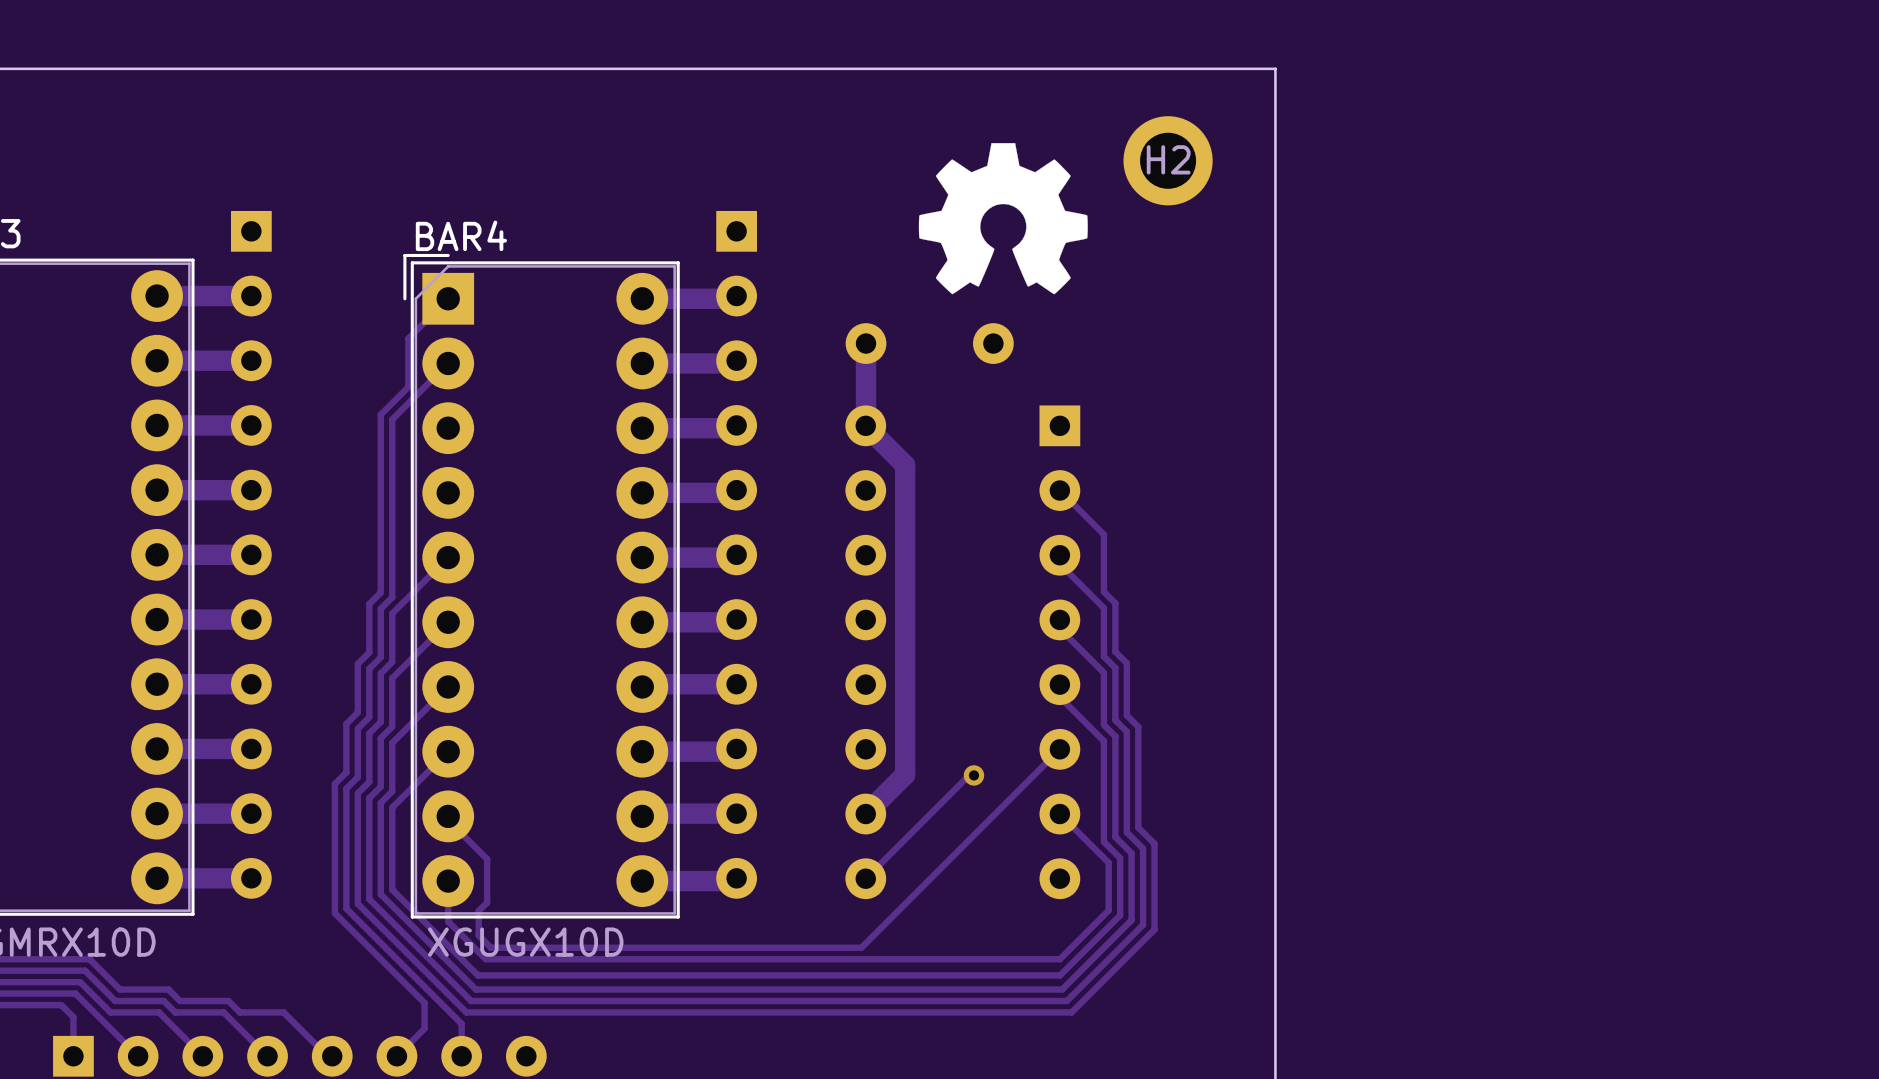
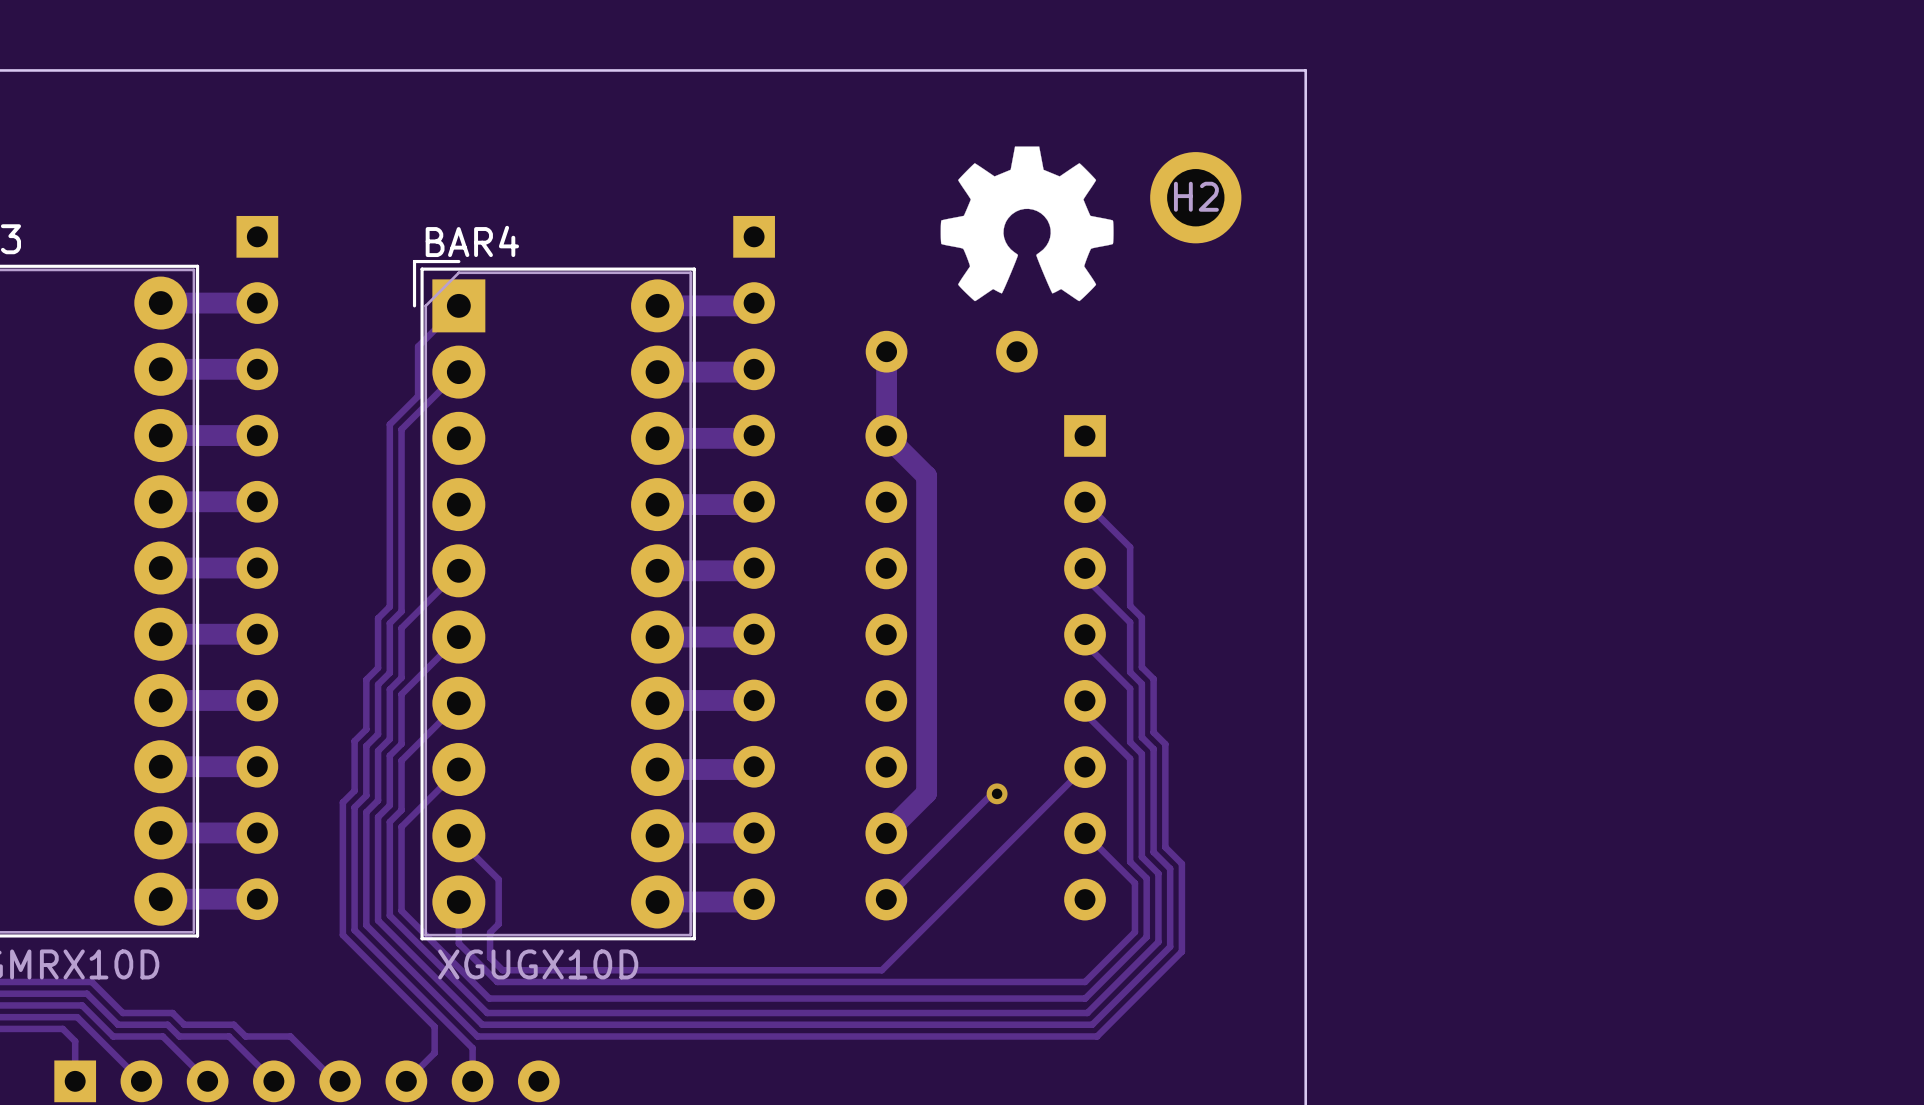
H2 position: (1168, 160) -> (1195, 197)

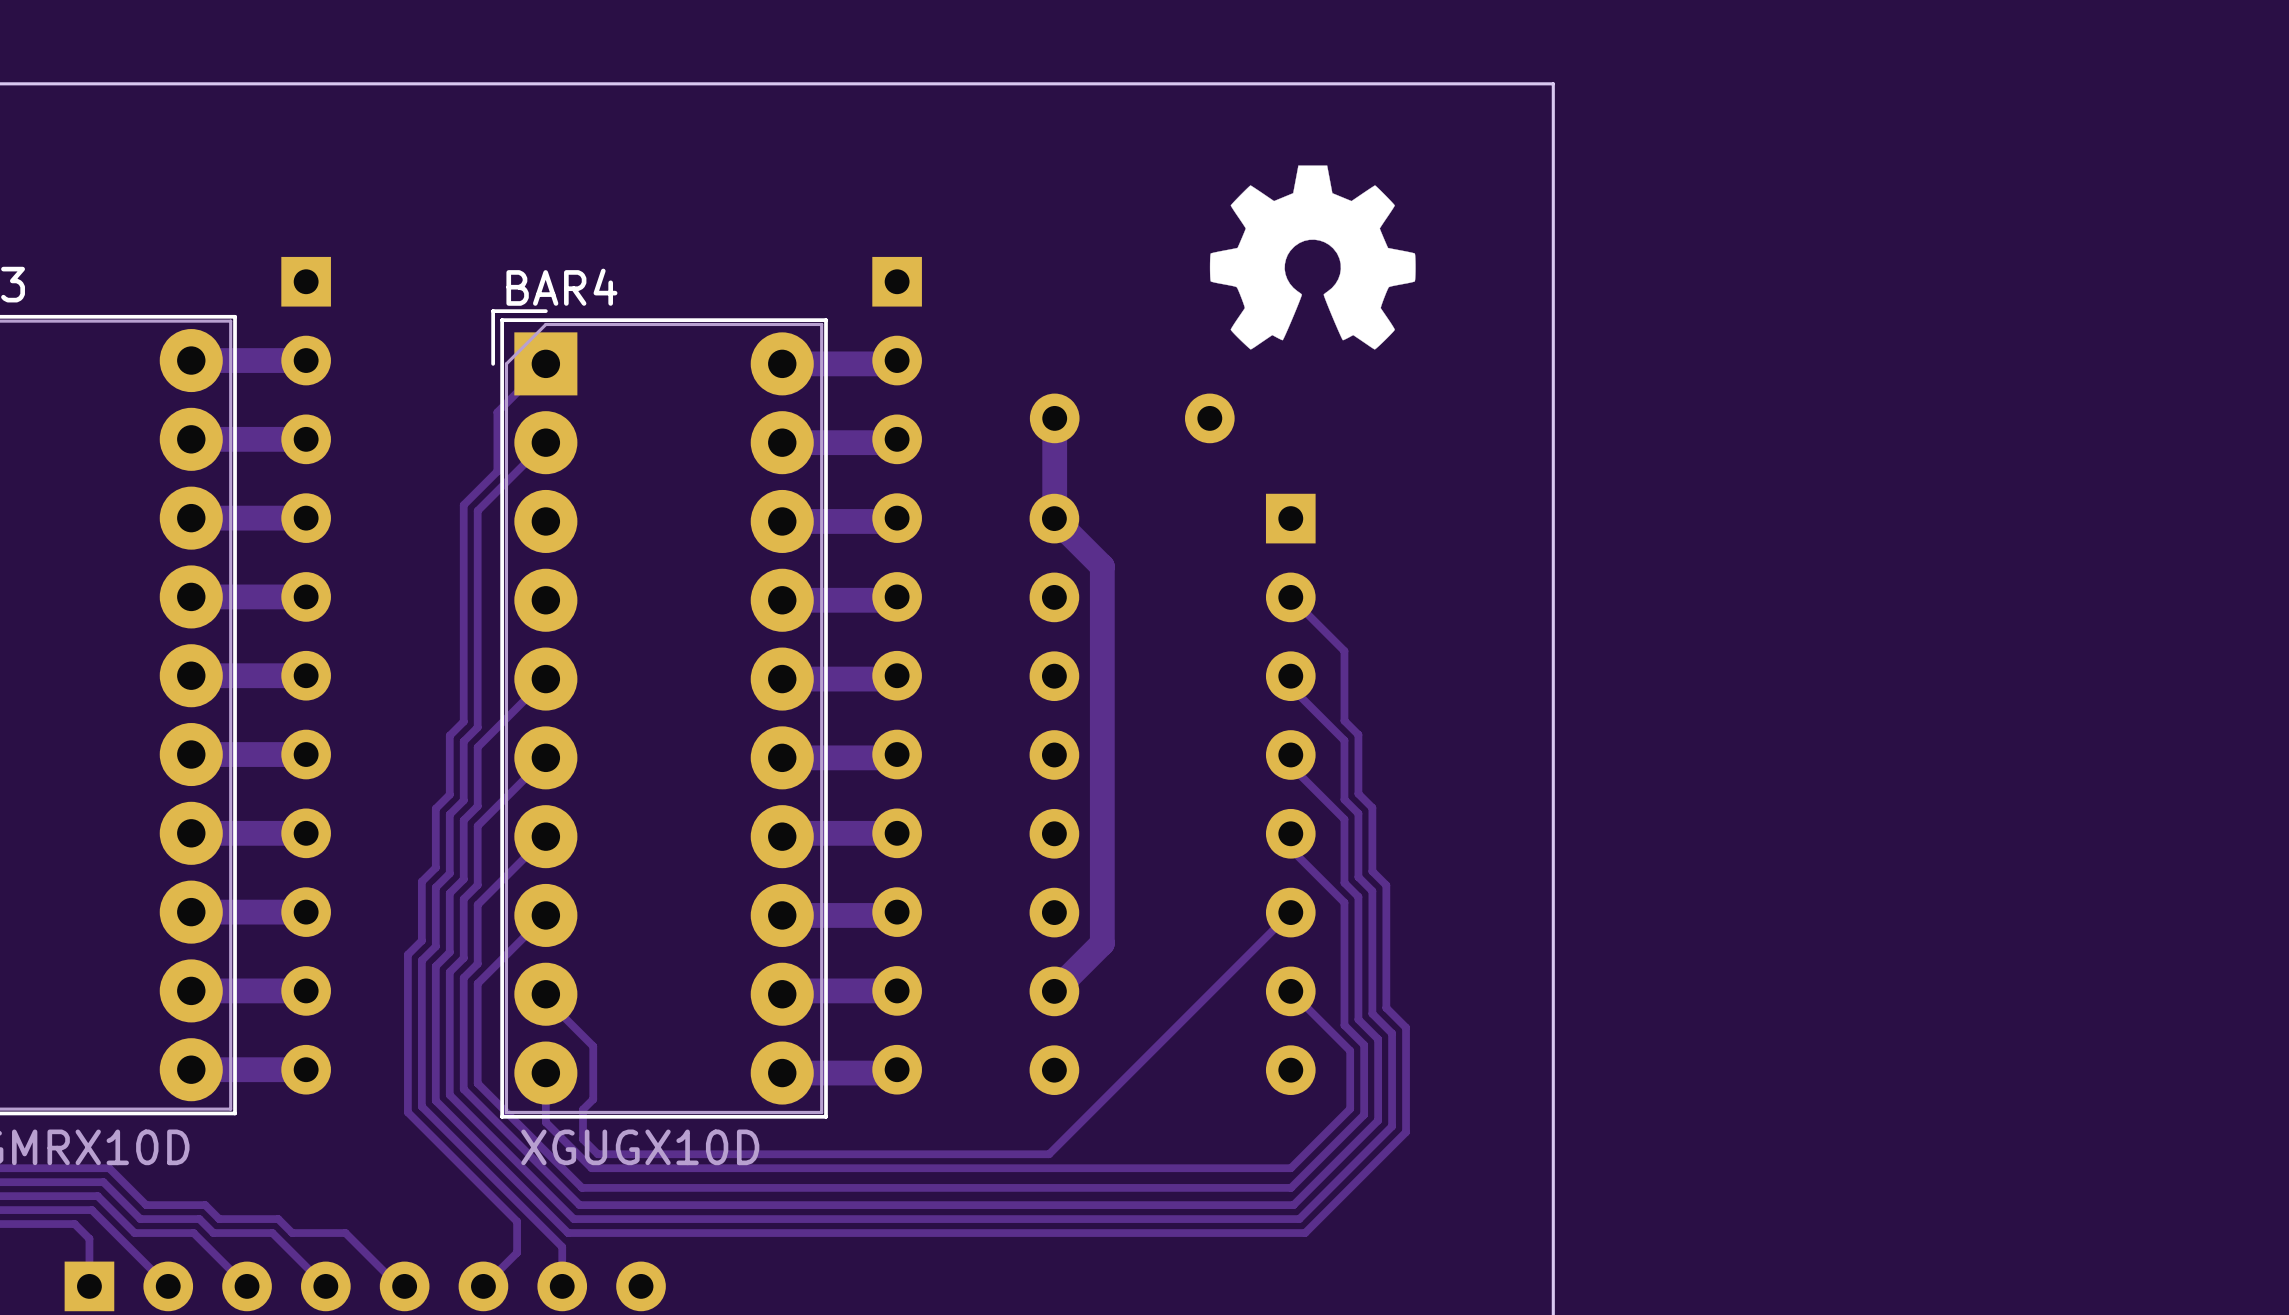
H2: (1195, 197) -> none
drawing position: (1027, 223) -> (1312, 257)
track: (997, 793) (992, 793) (886, 899) -> none
via: (997, 793) -> none

